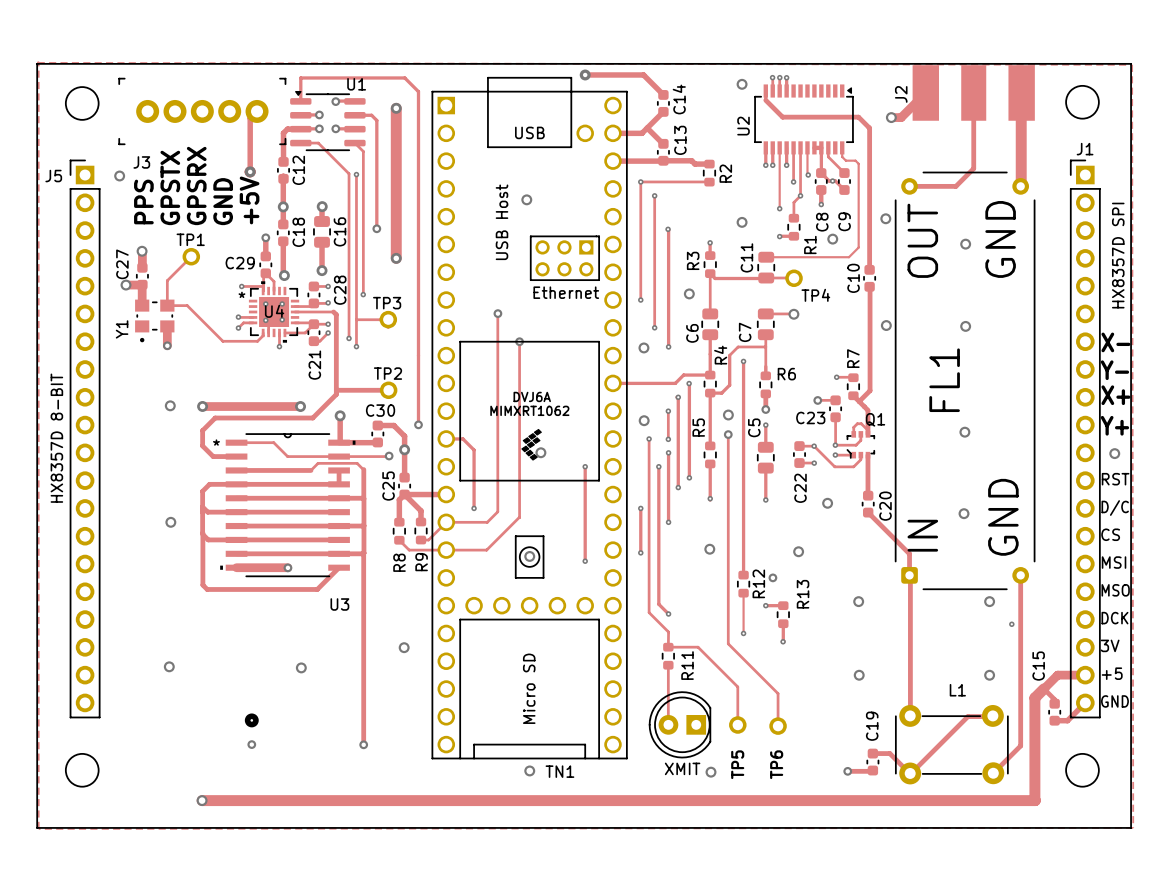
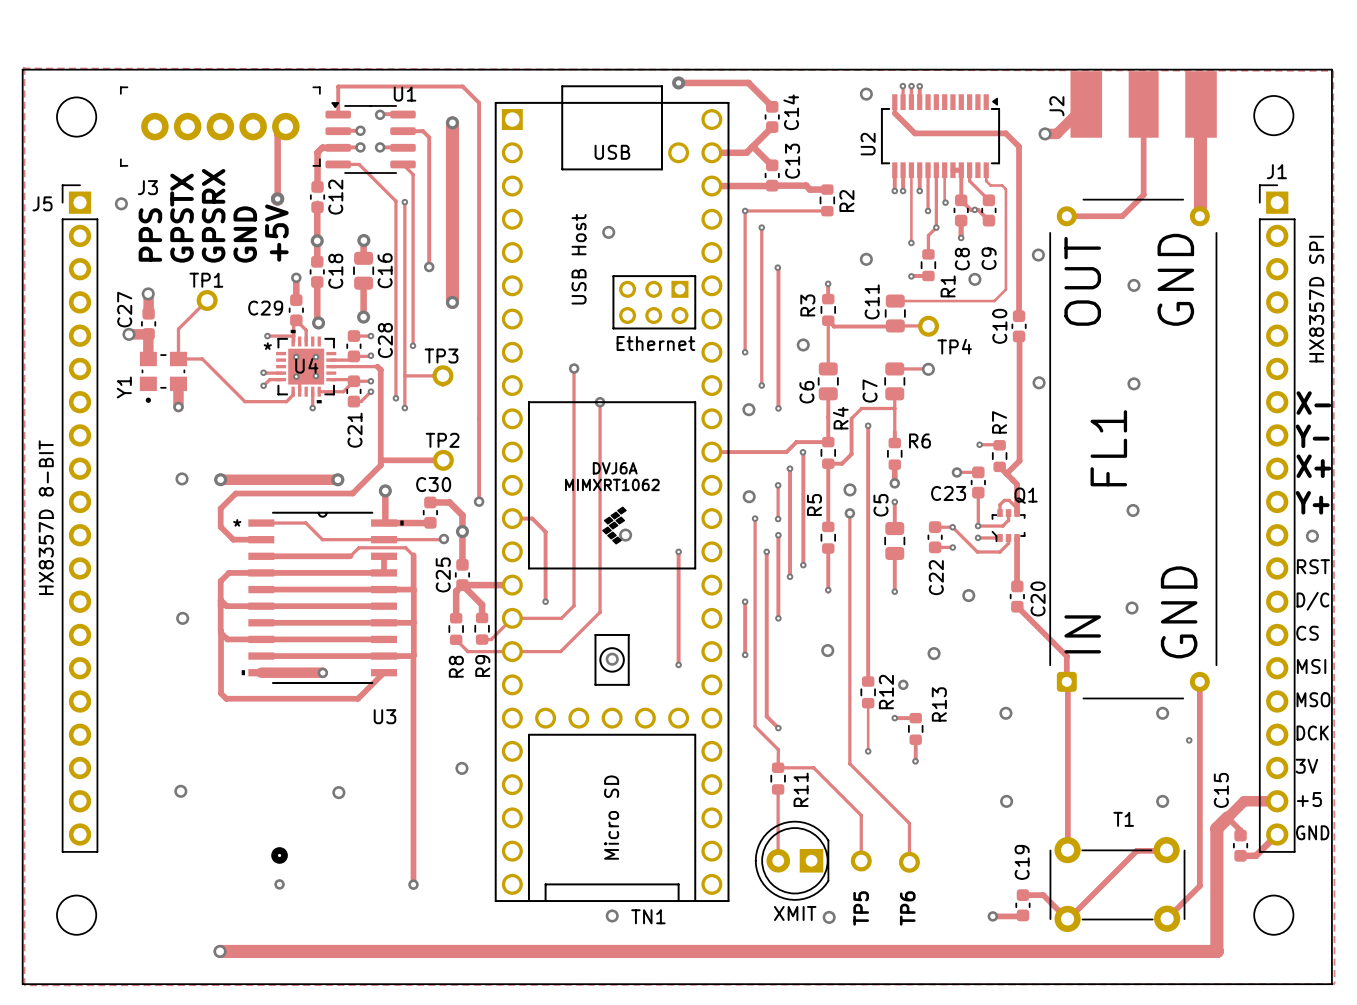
L1 name: L1 (957, 690) -> T1 (1123, 819)

